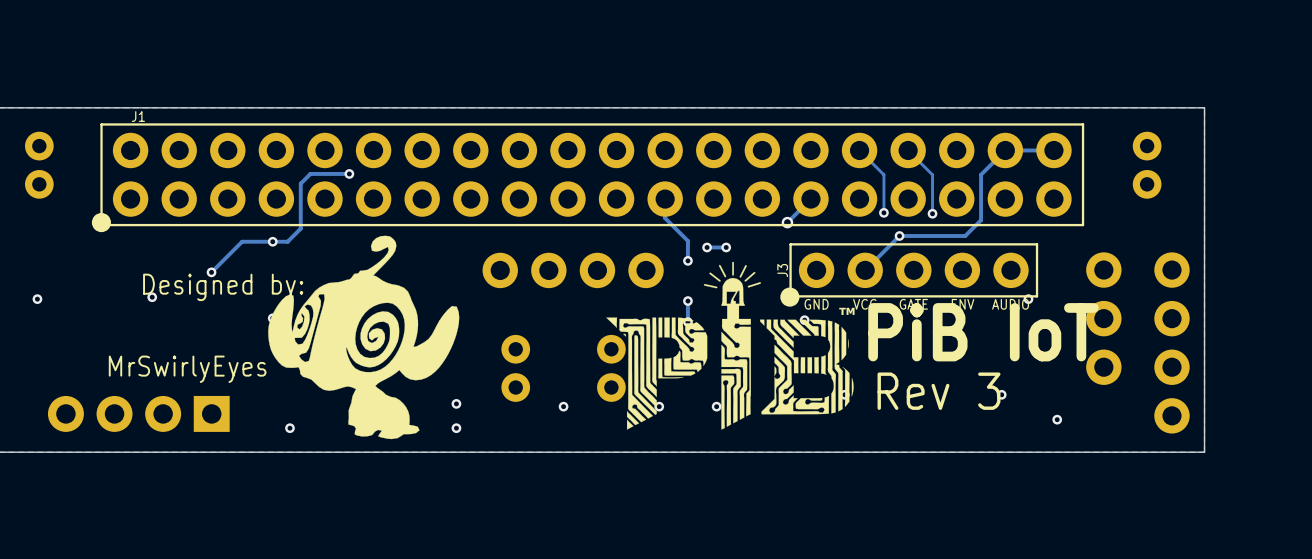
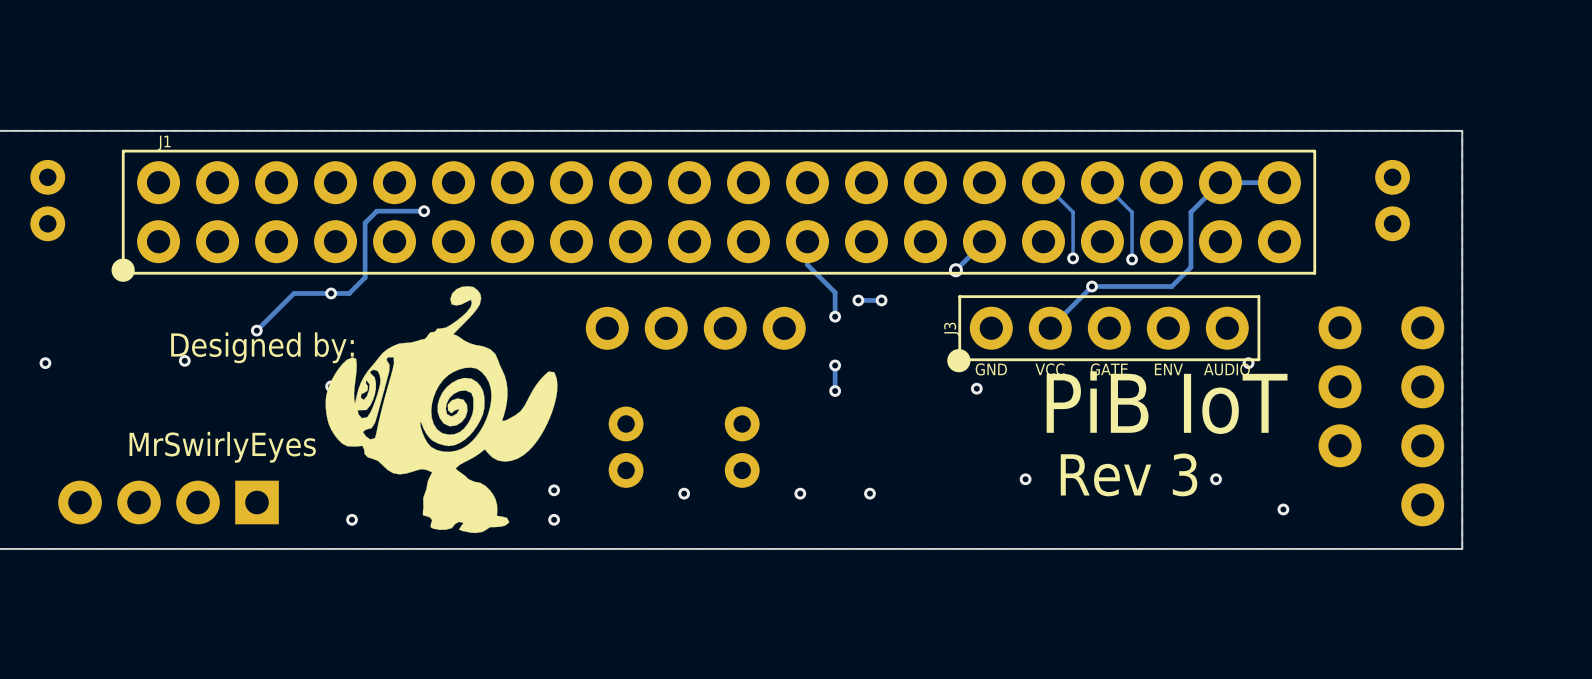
drawing: [606, 261, 855, 430] -> none

